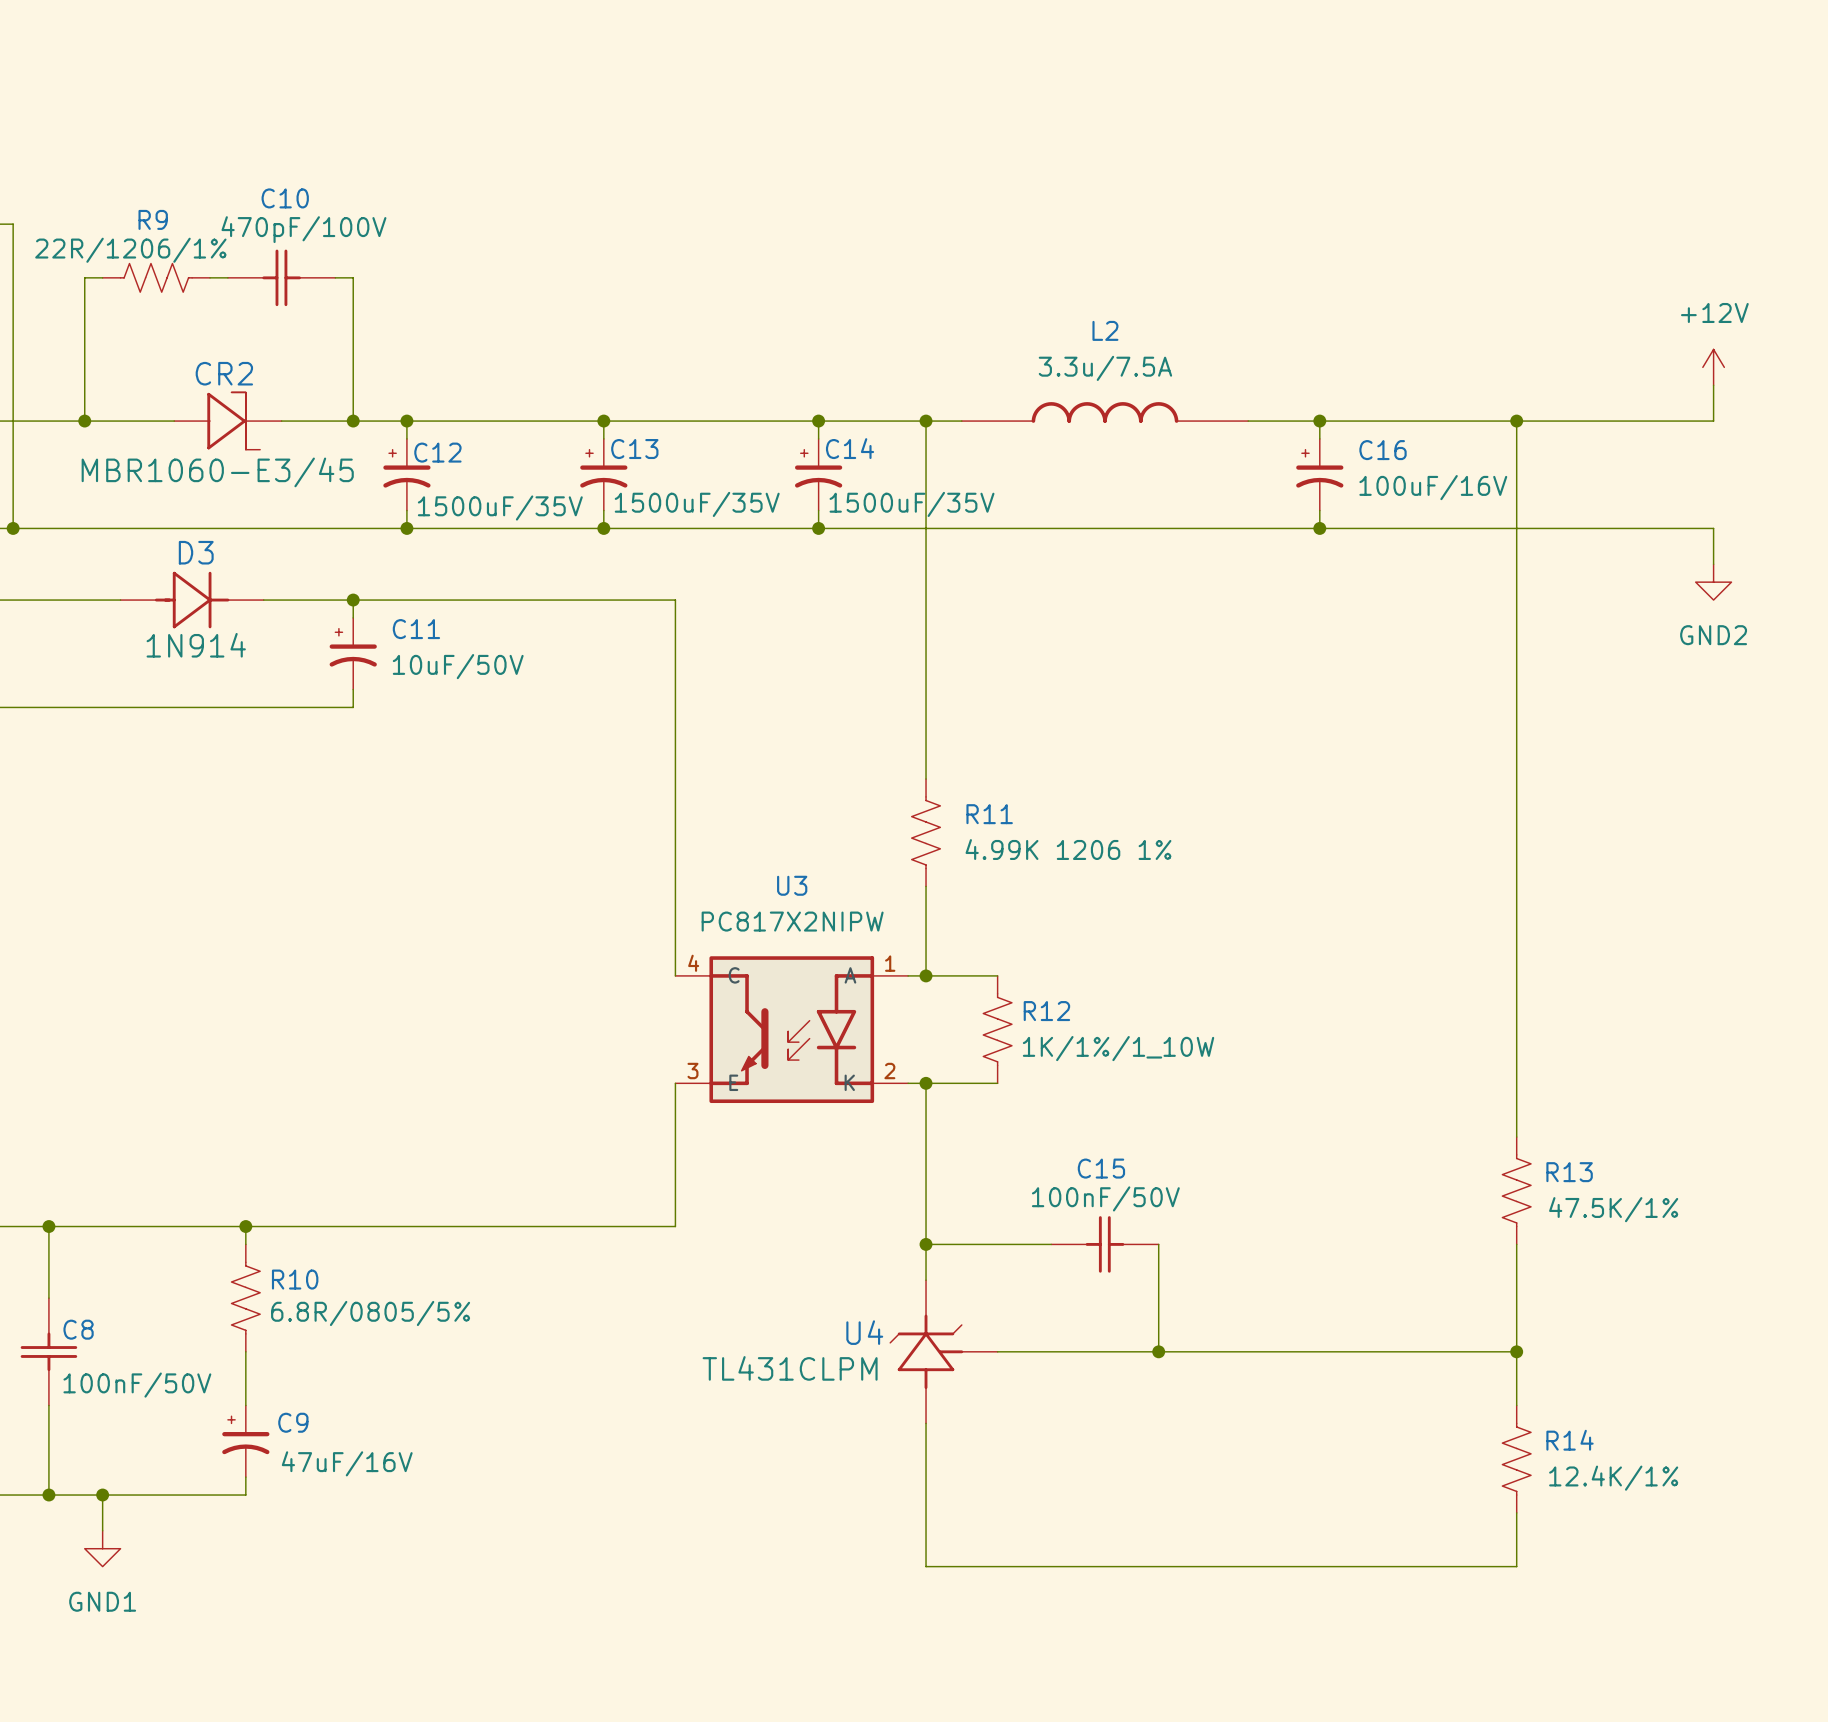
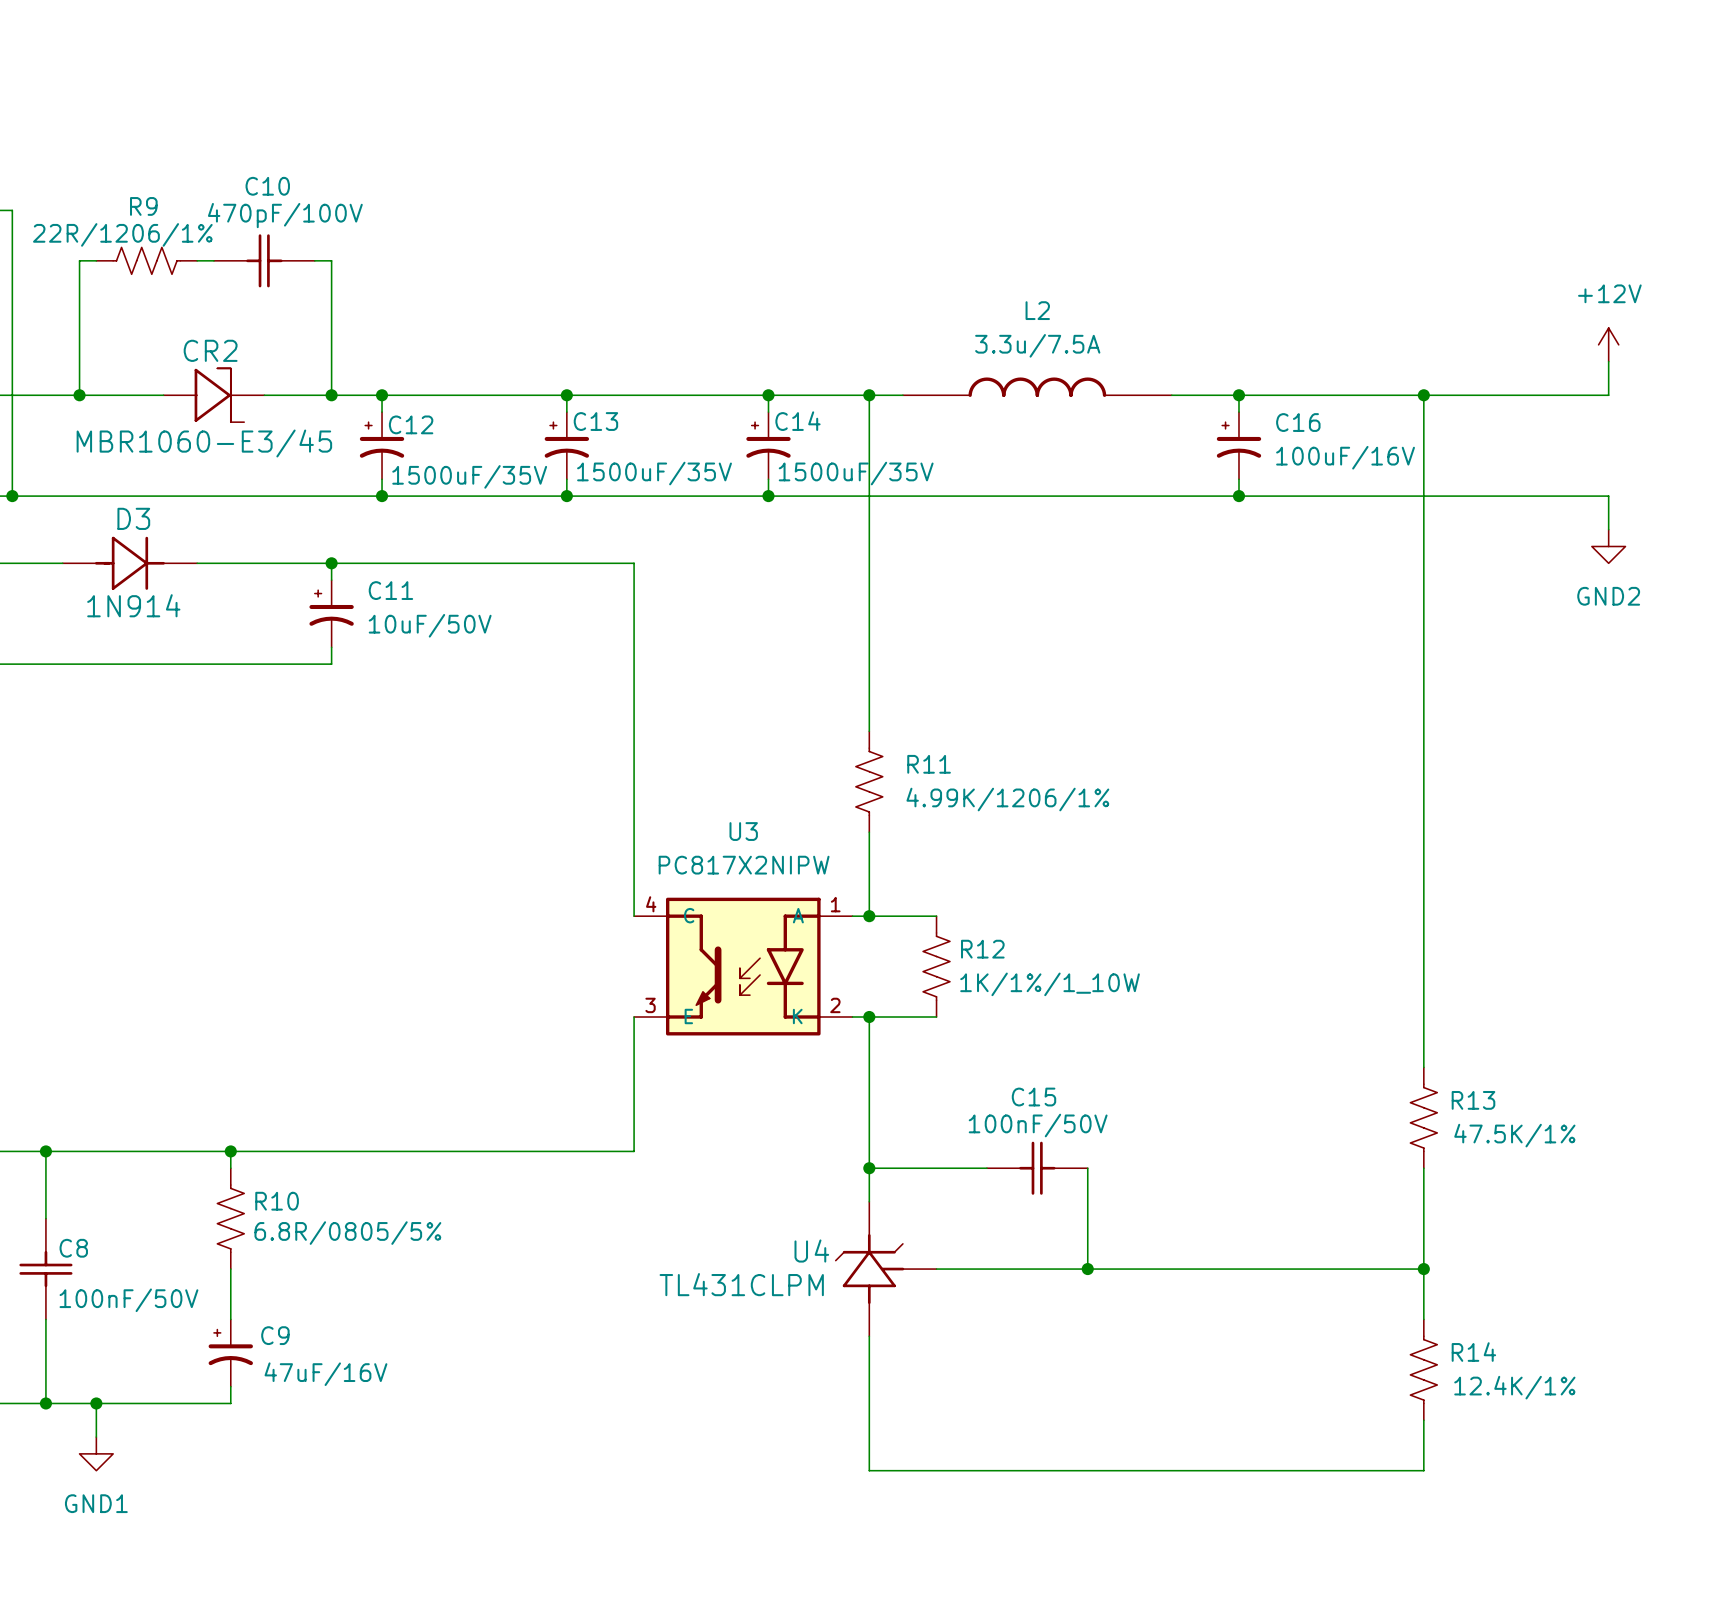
D3 position: (192, 600) -> (129, 563)
R11 value: 4.99K 1206 1% (1068, 849) -> 4.99K/1206/1% (1007, 799)

